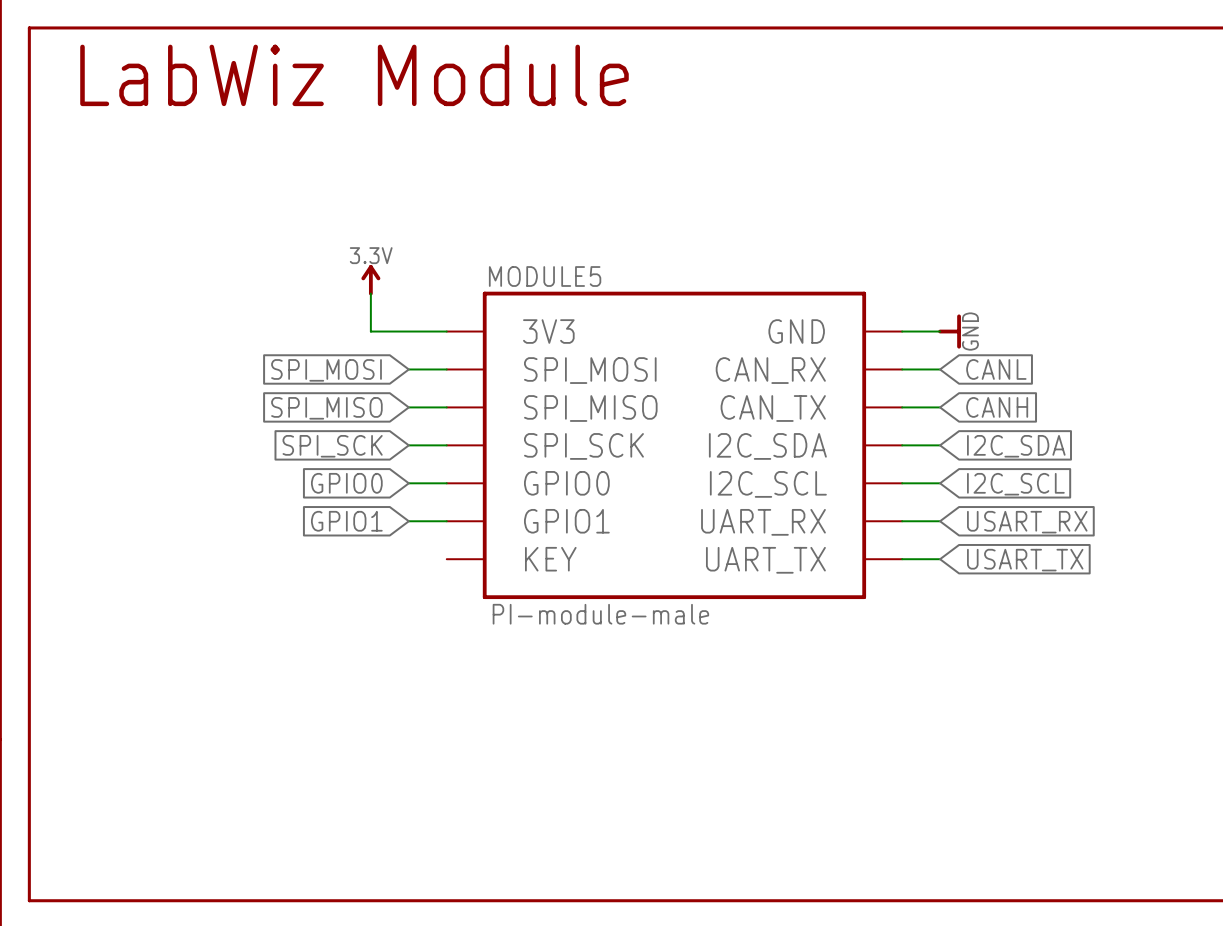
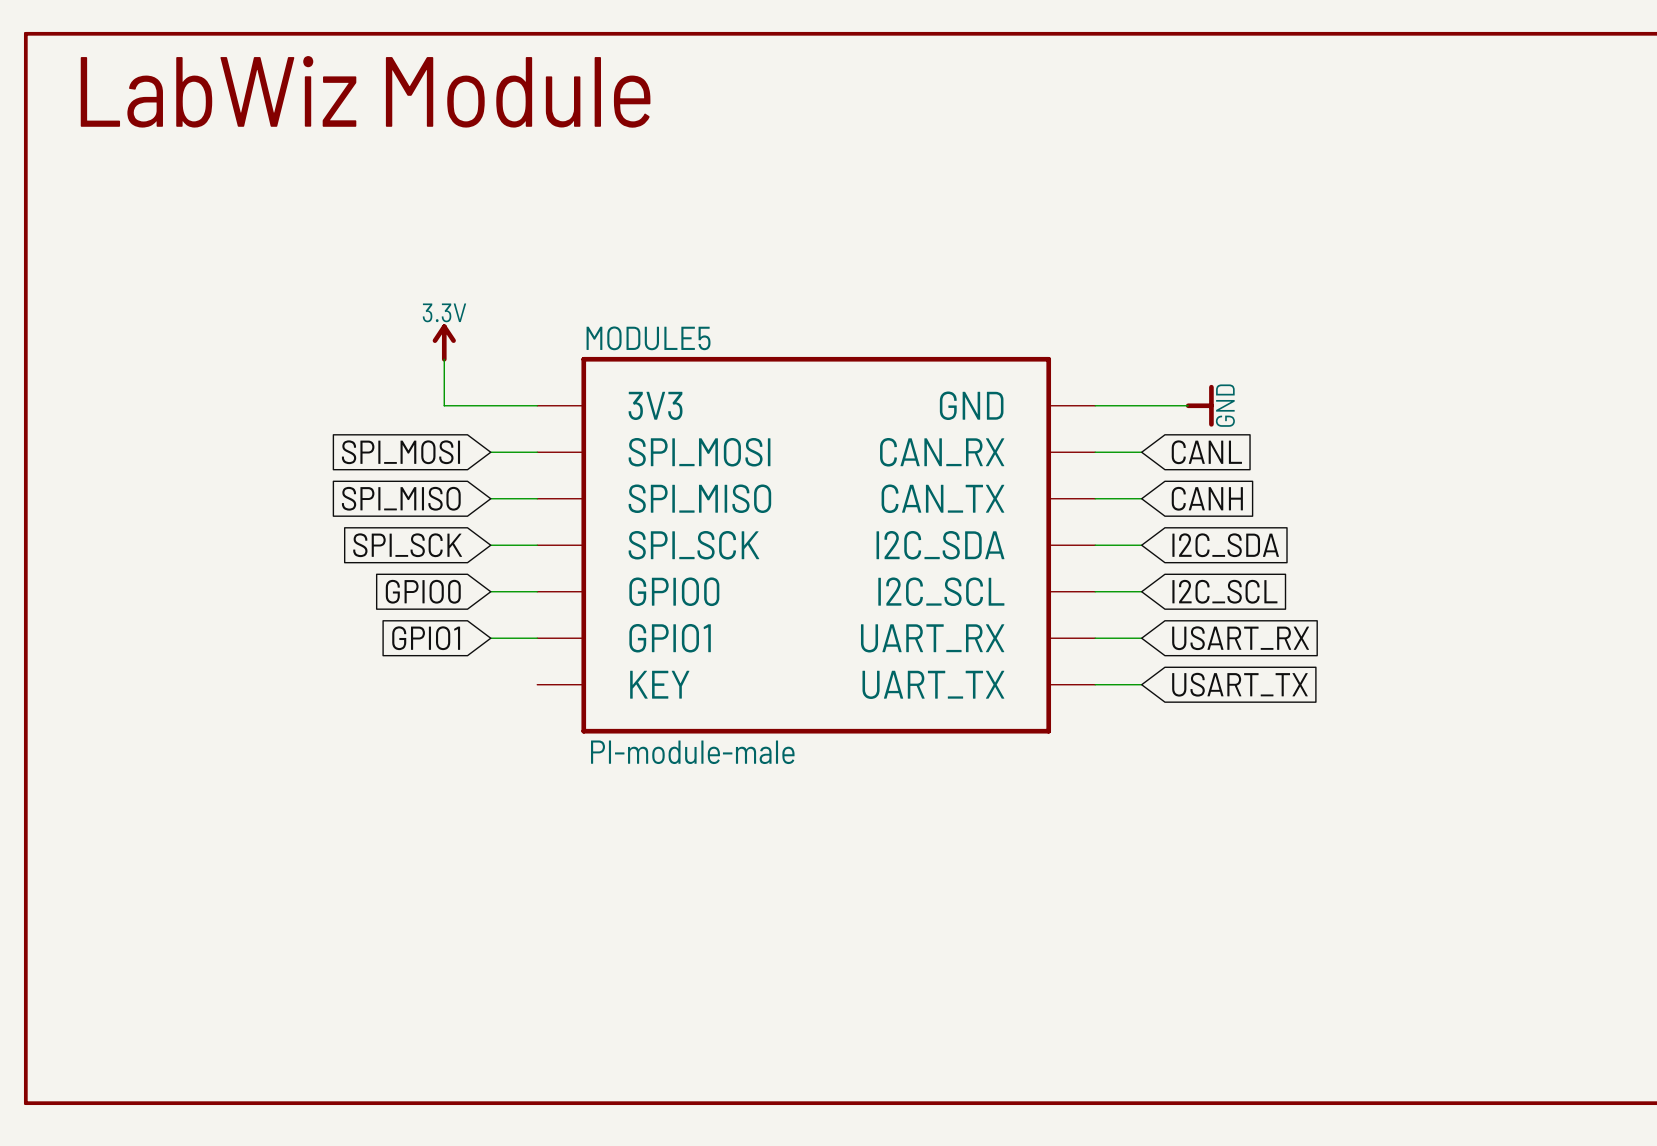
power symbol position: GND (949, 331) -> GND (1199, 405)

